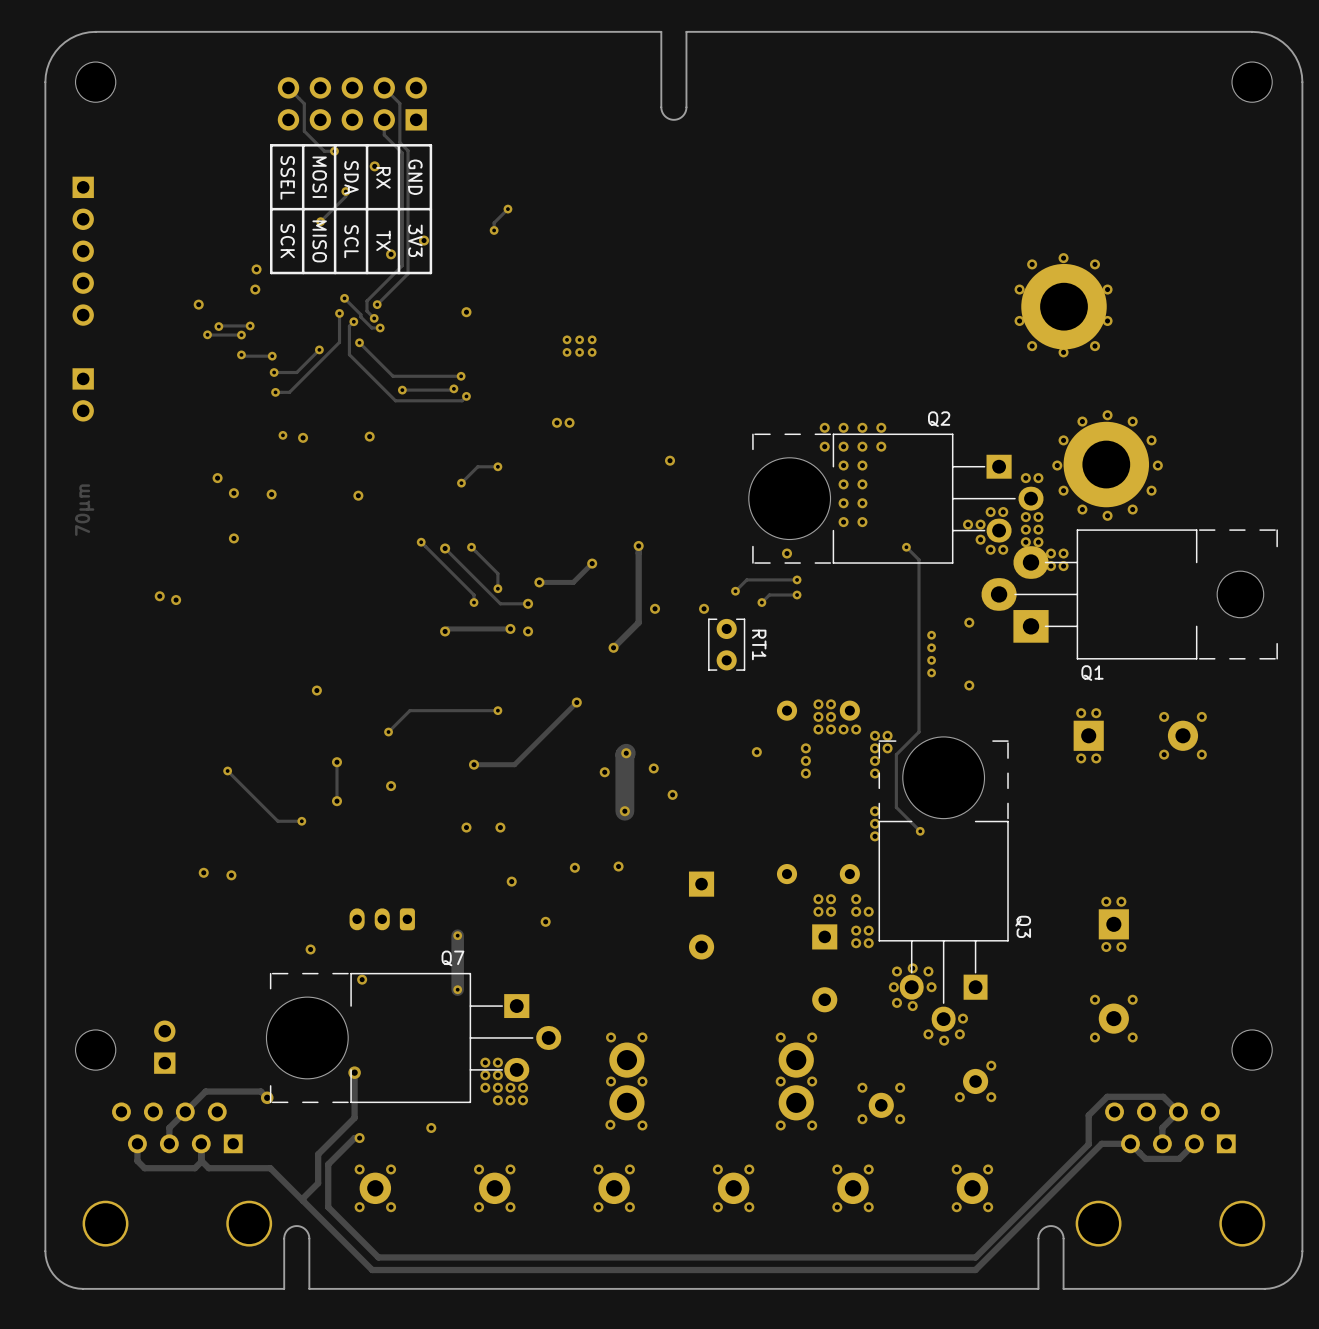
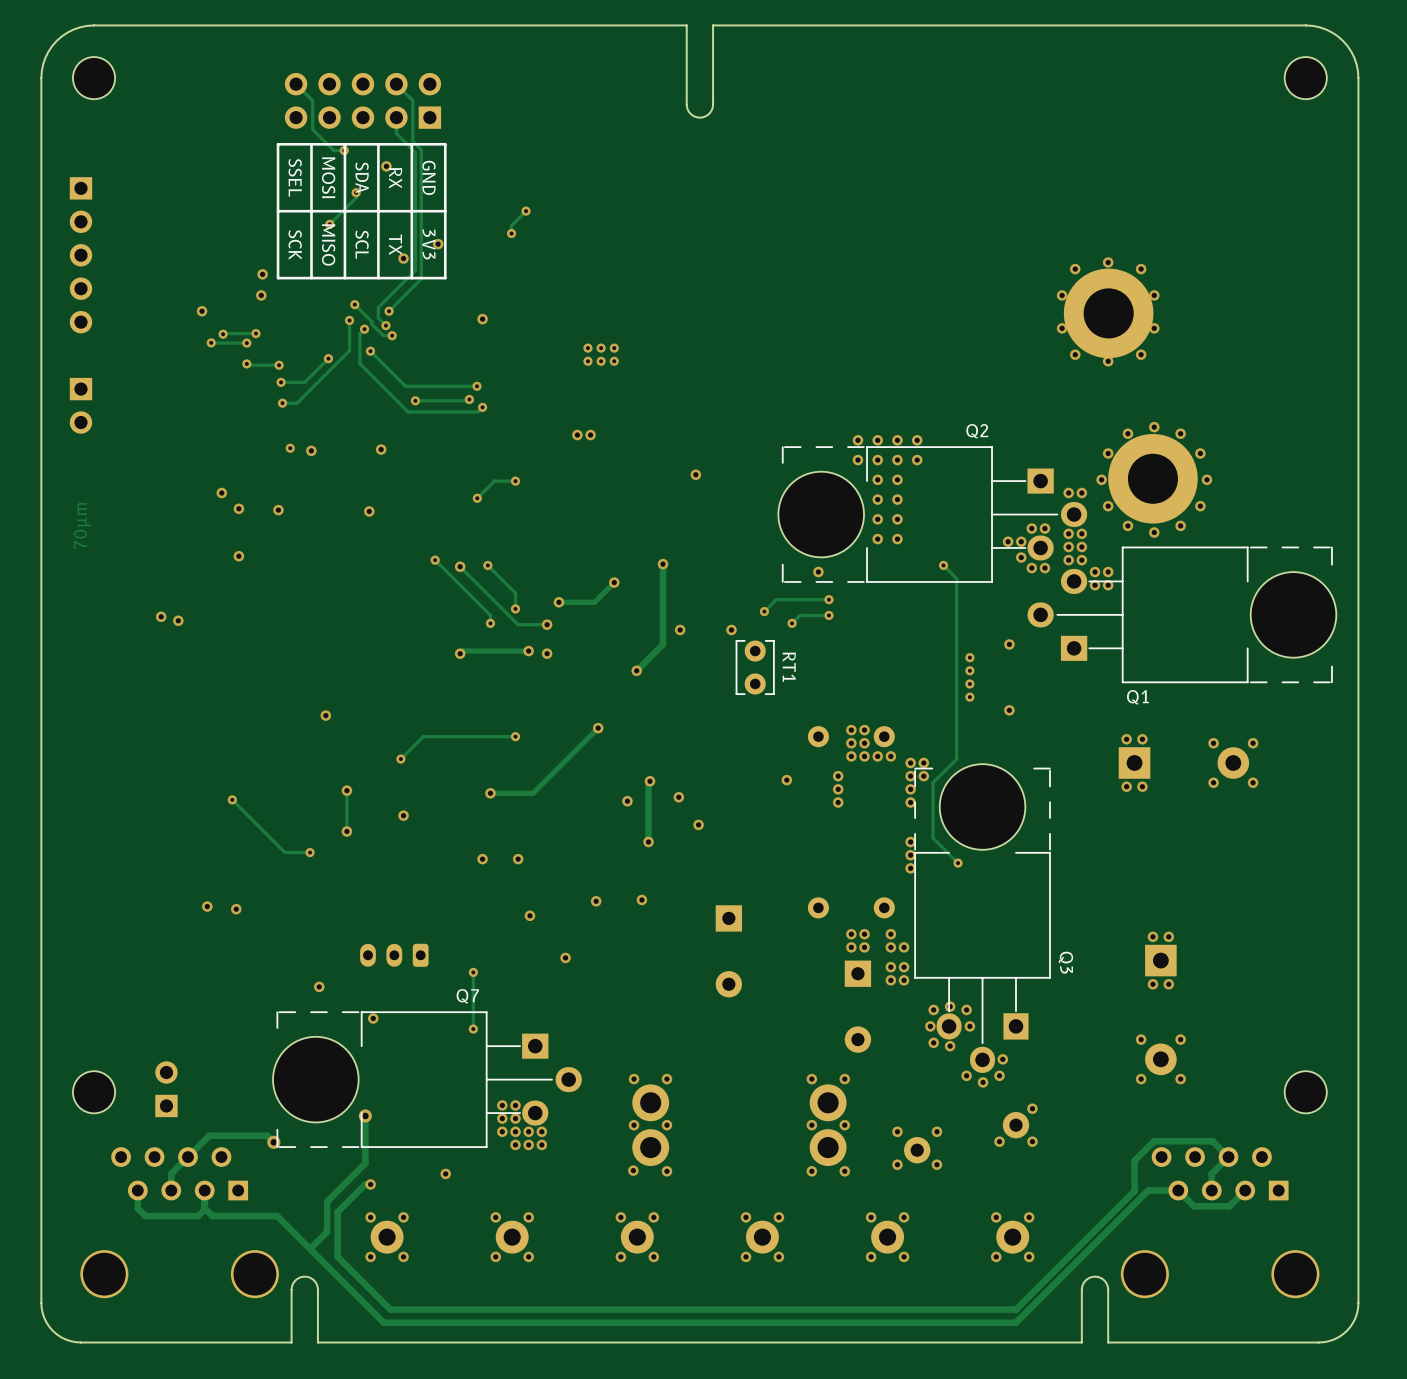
Q1 footprint: [981, 529, 1278, 660] -> [1027, 546, 1337, 684]
track width: thick (626, 753) (624, 811) -> thin (650, 781) (648, 842)
track width: thick (457, 935) (457, 989) -> thin (473, 972) (473, 1029)

